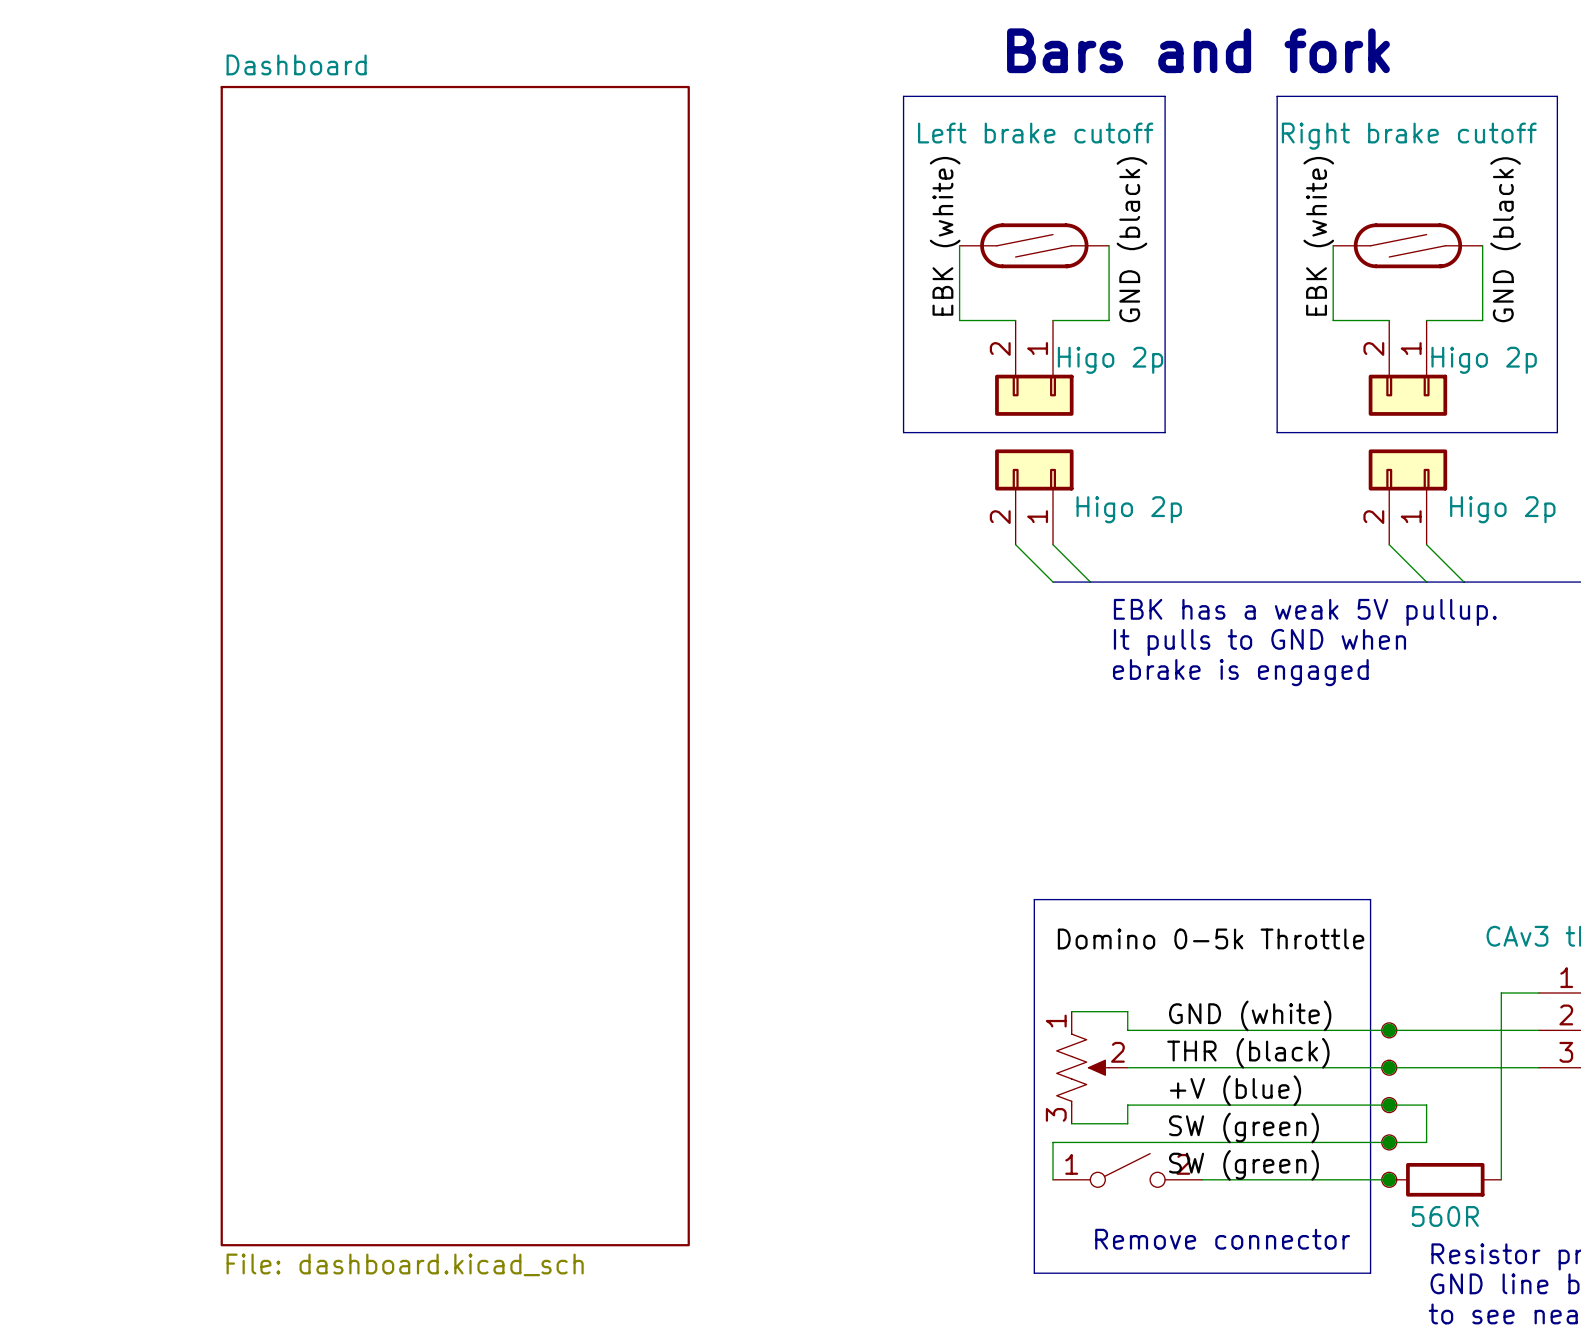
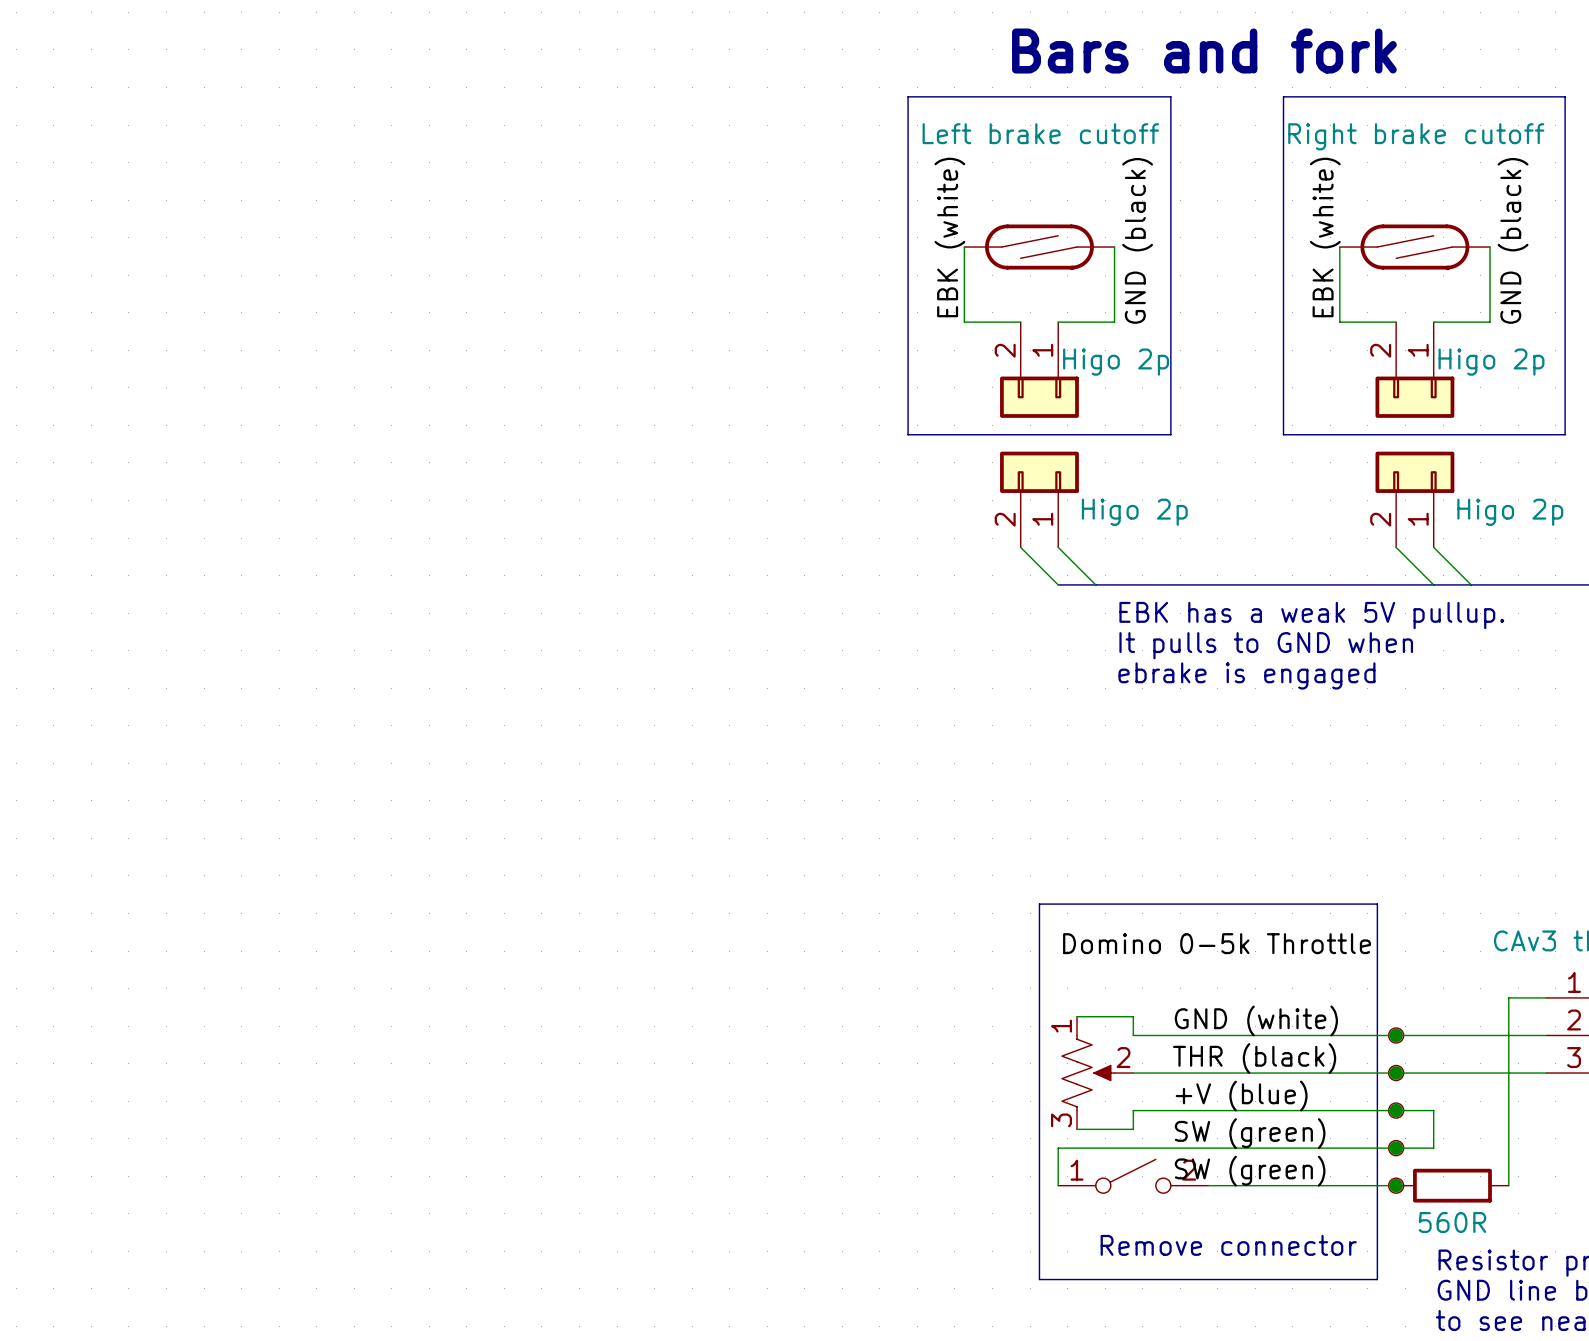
sheet Dashboard: File: dashboard.kicad_sch (455, 666) -> none

